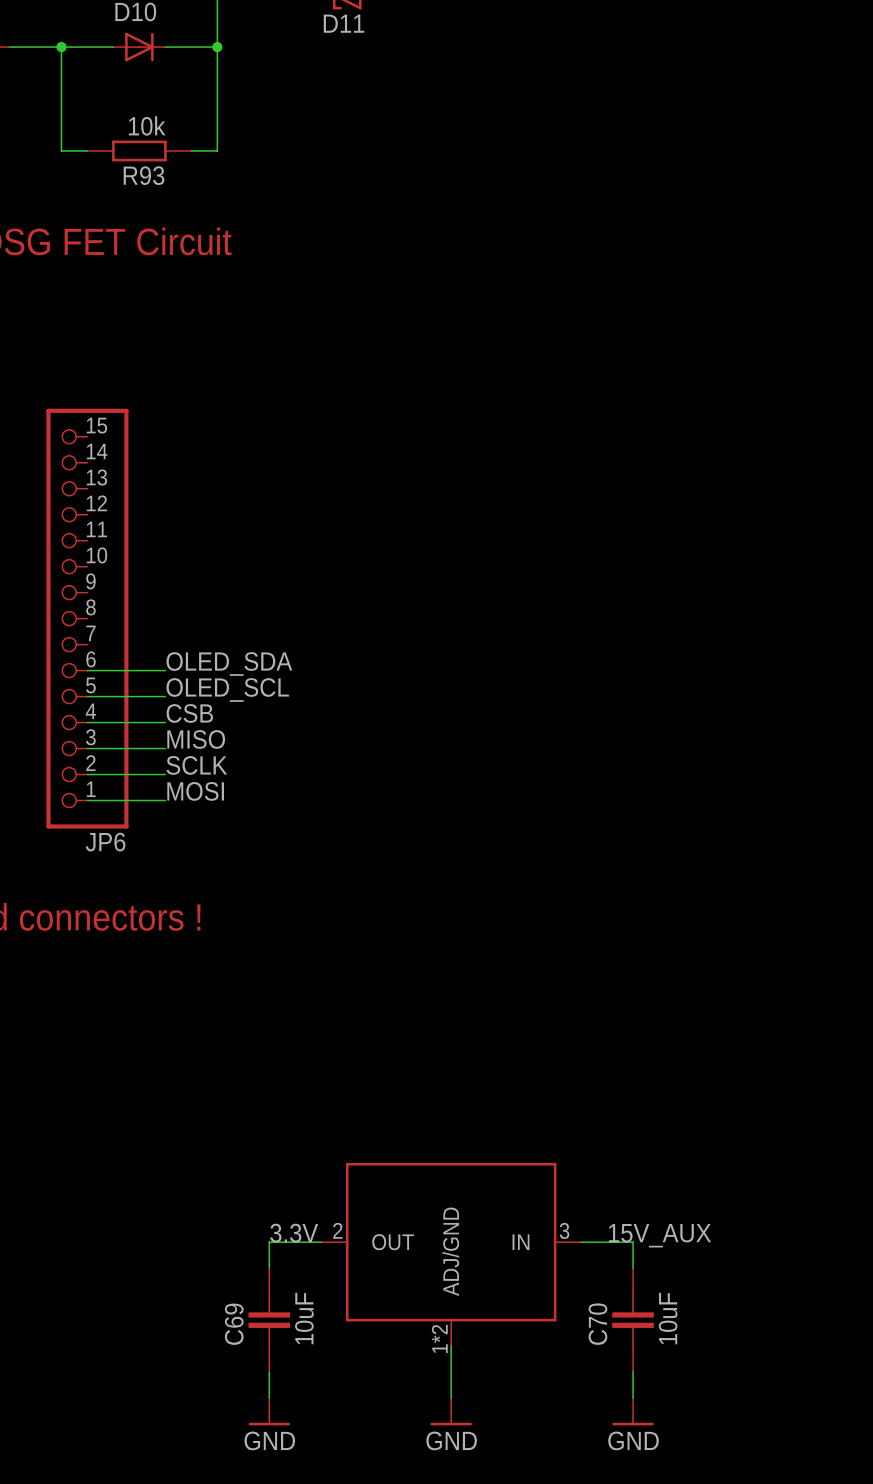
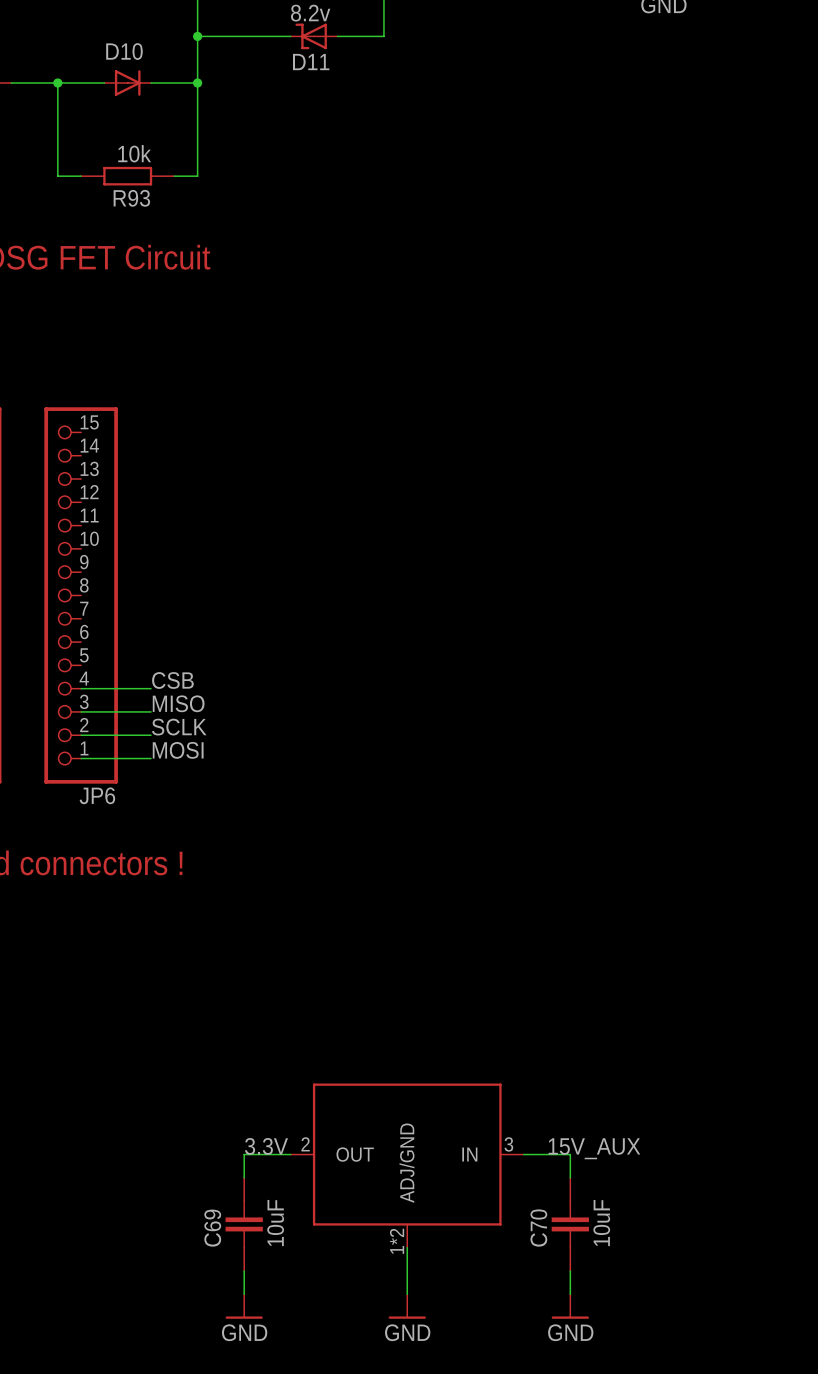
label: OLED_SDA (229, 664) -> none
wire: (87, 670) (165, 670) -> none
label: OLED_SCL (227, 689) -> none
wire: (87, 696) (165, 696) -> none

